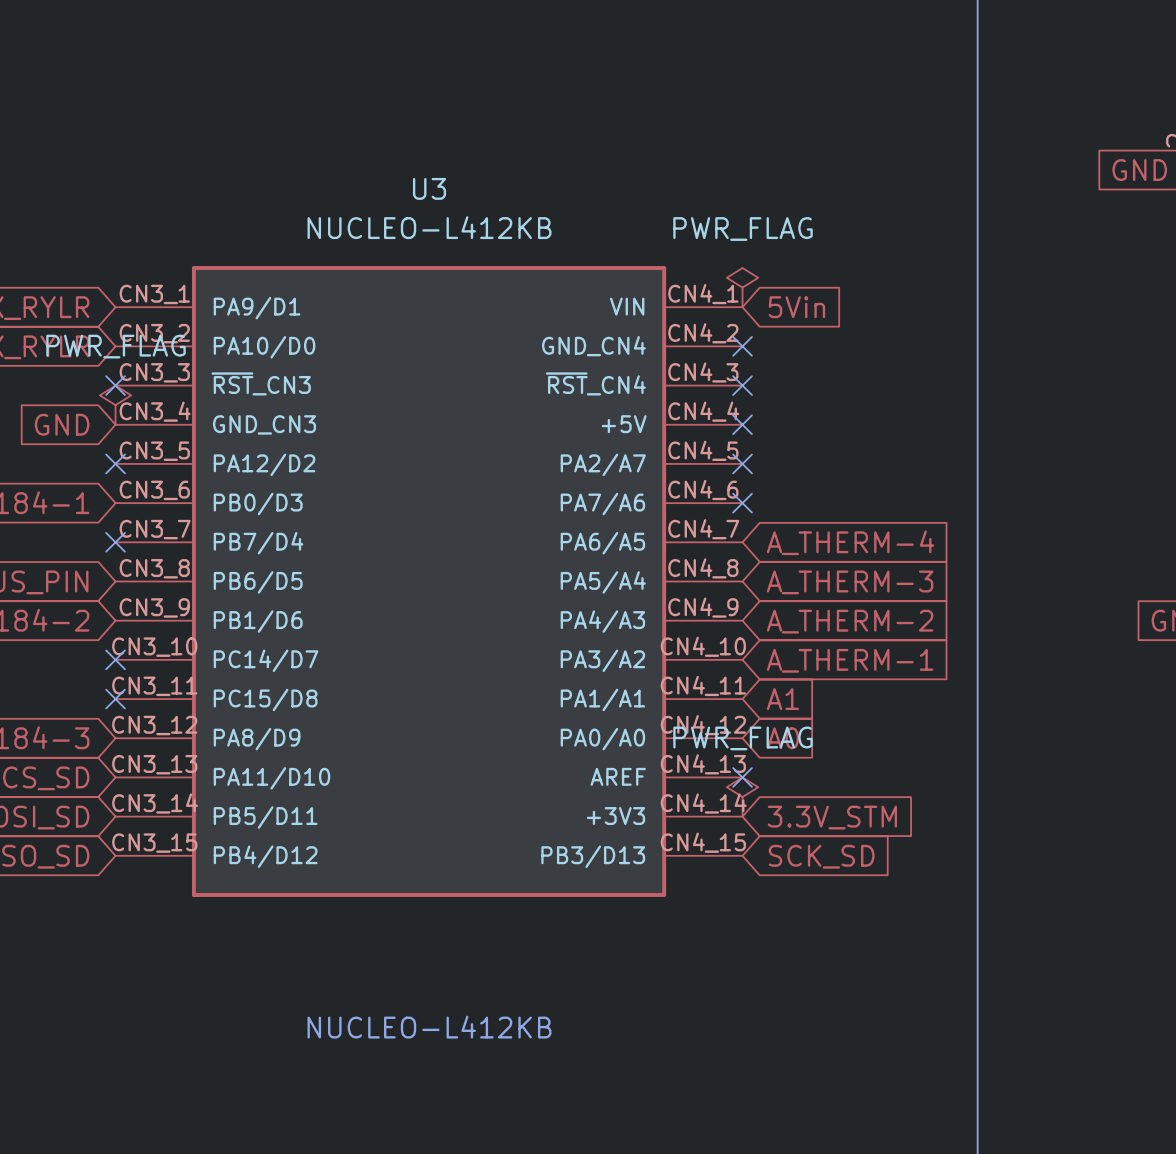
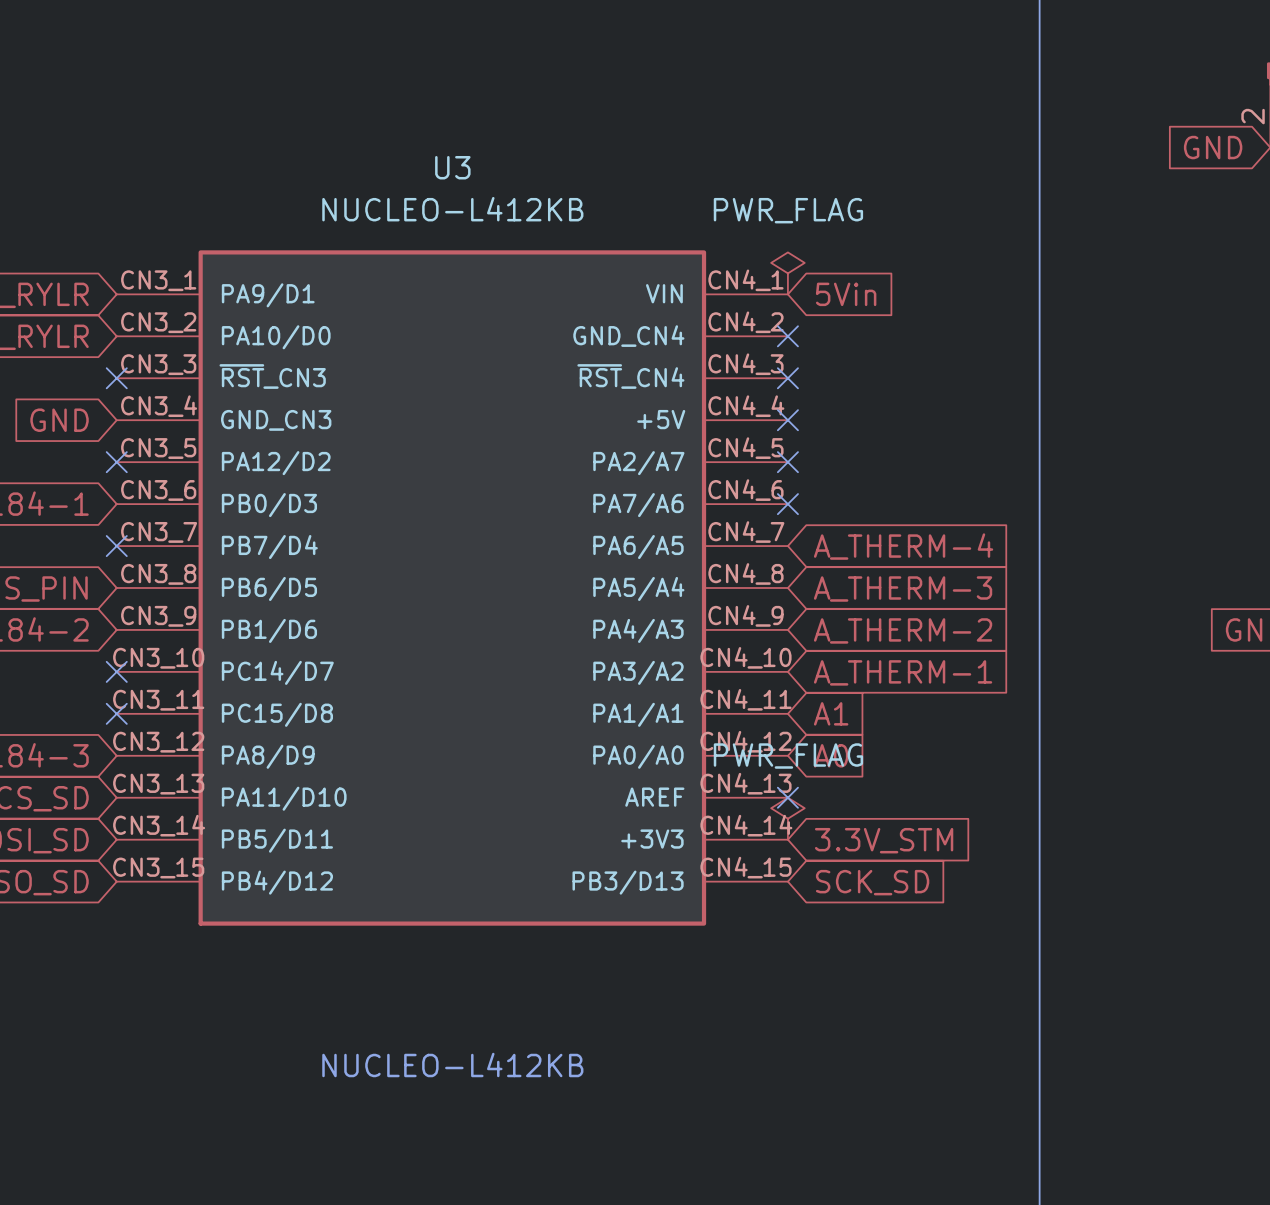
power symbol: PWR_FLAG (115, 405) -> none

